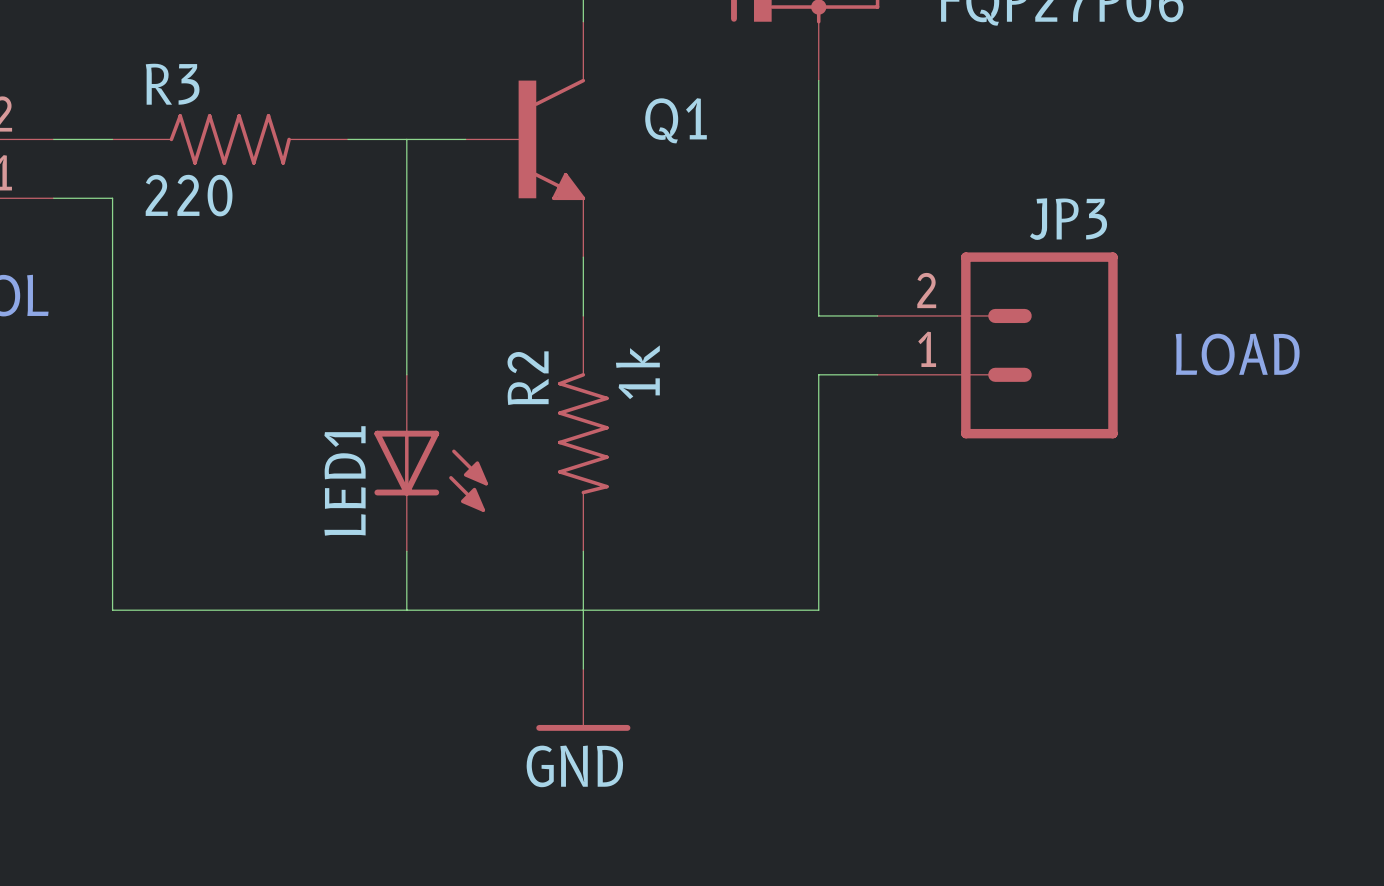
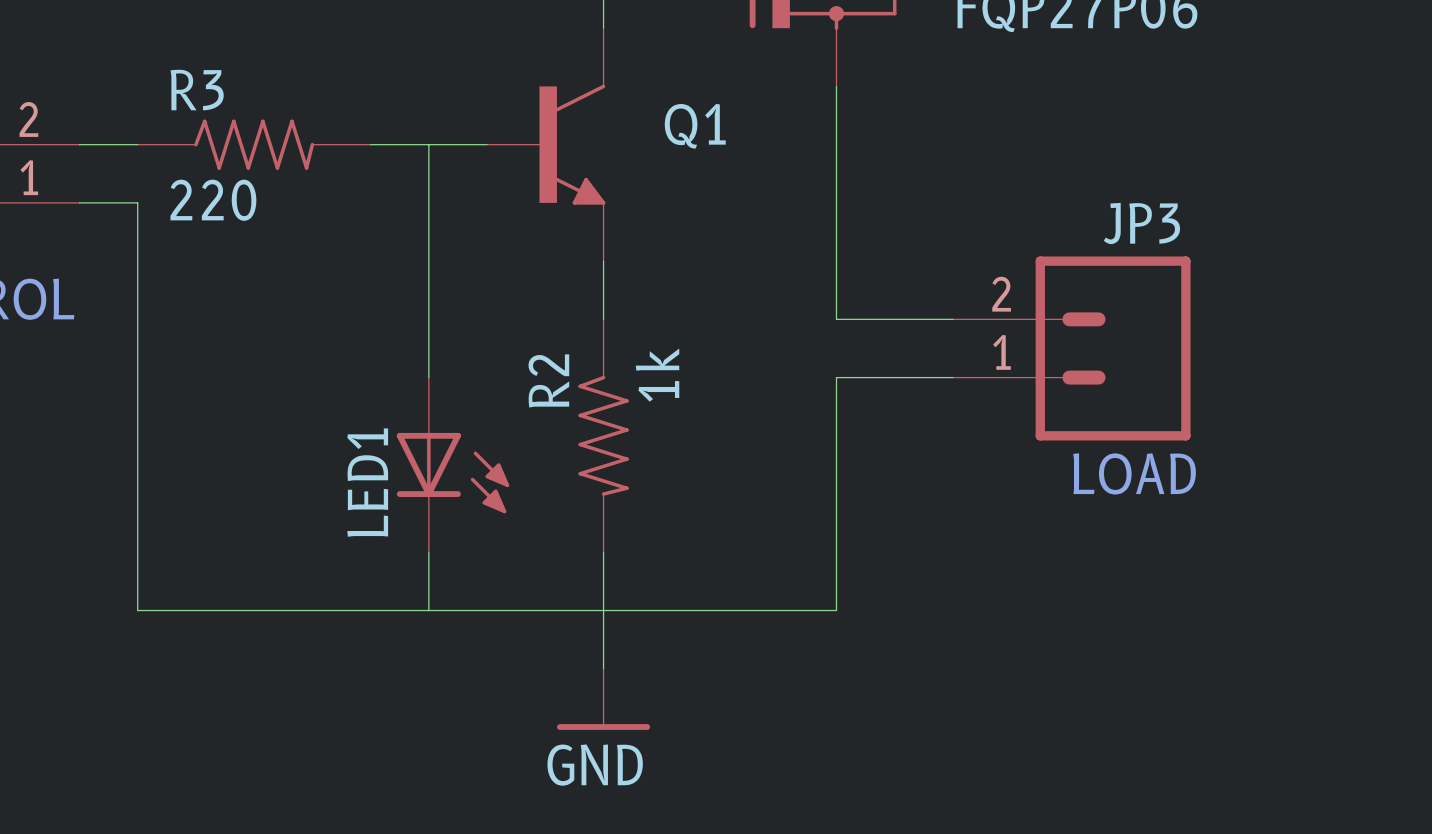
JP3 position: (997, 345) -> (1071, 348)
text position: LOAD (1237, 354) -> LOAD (1134, 473)

